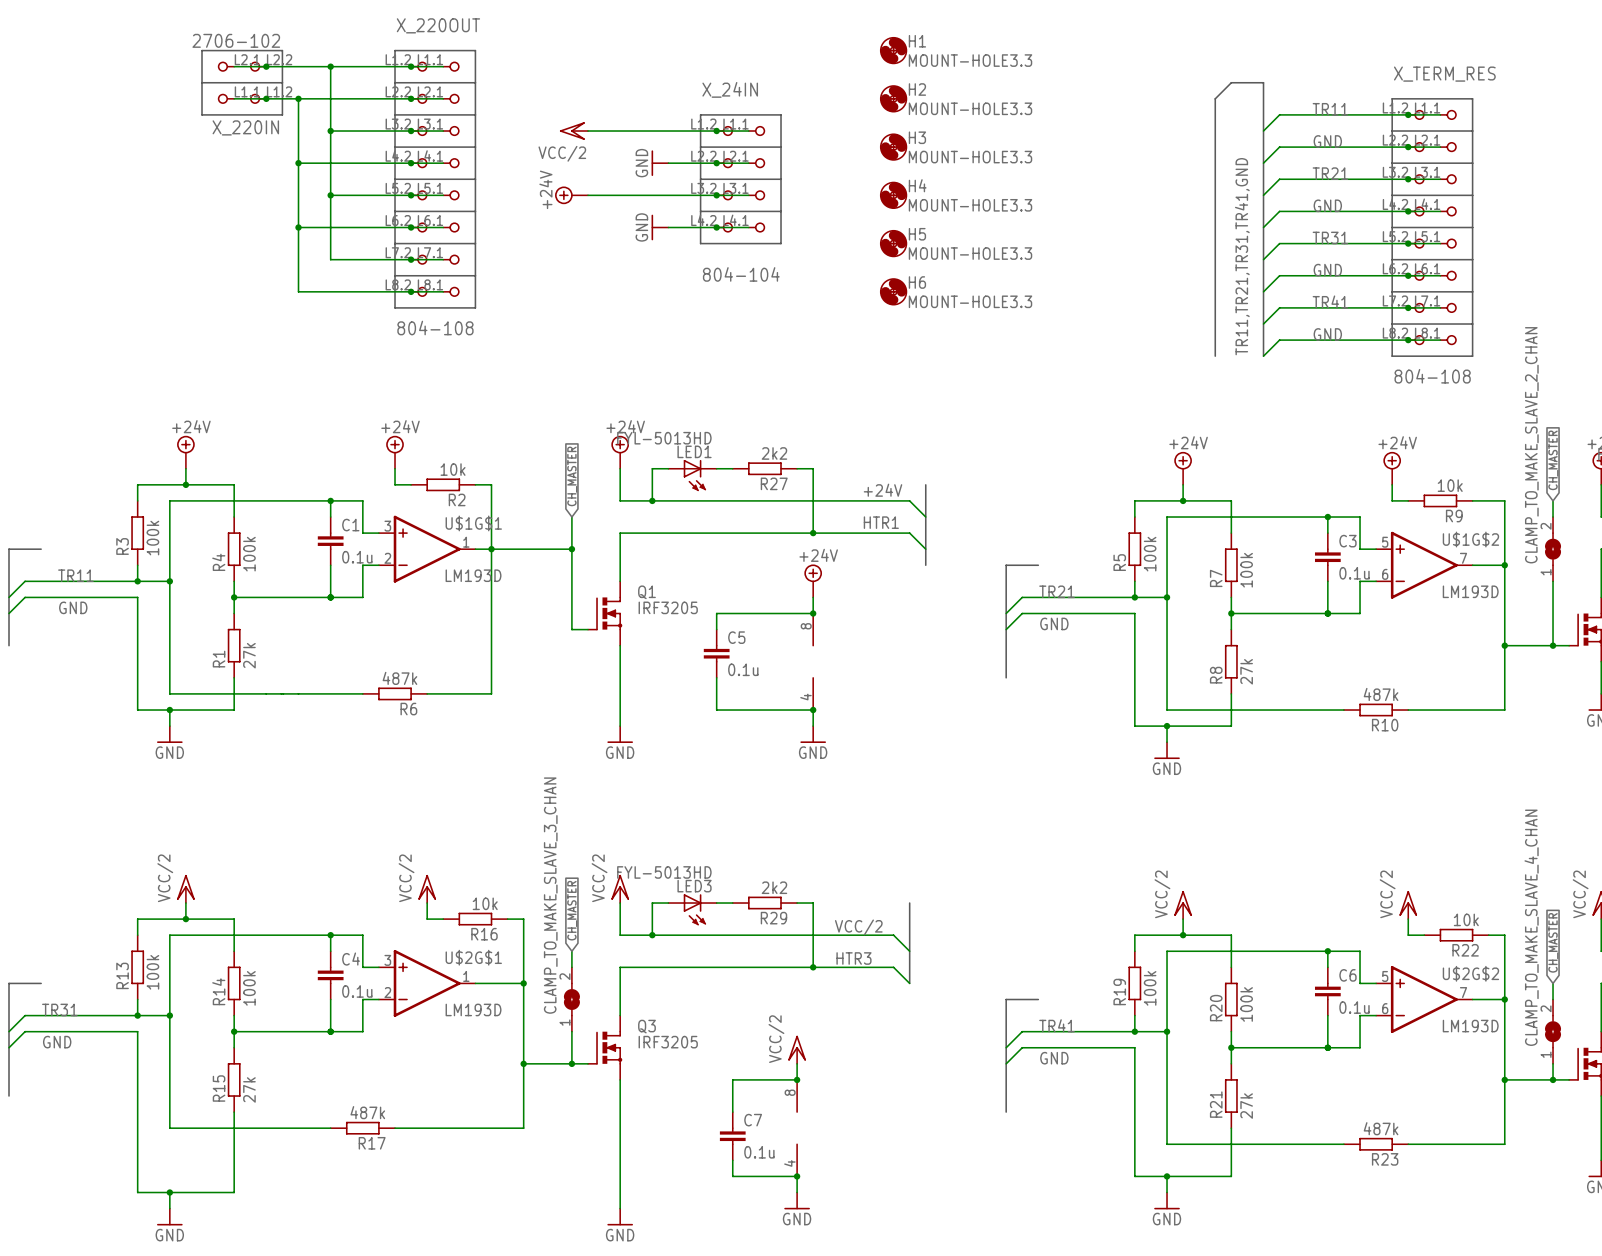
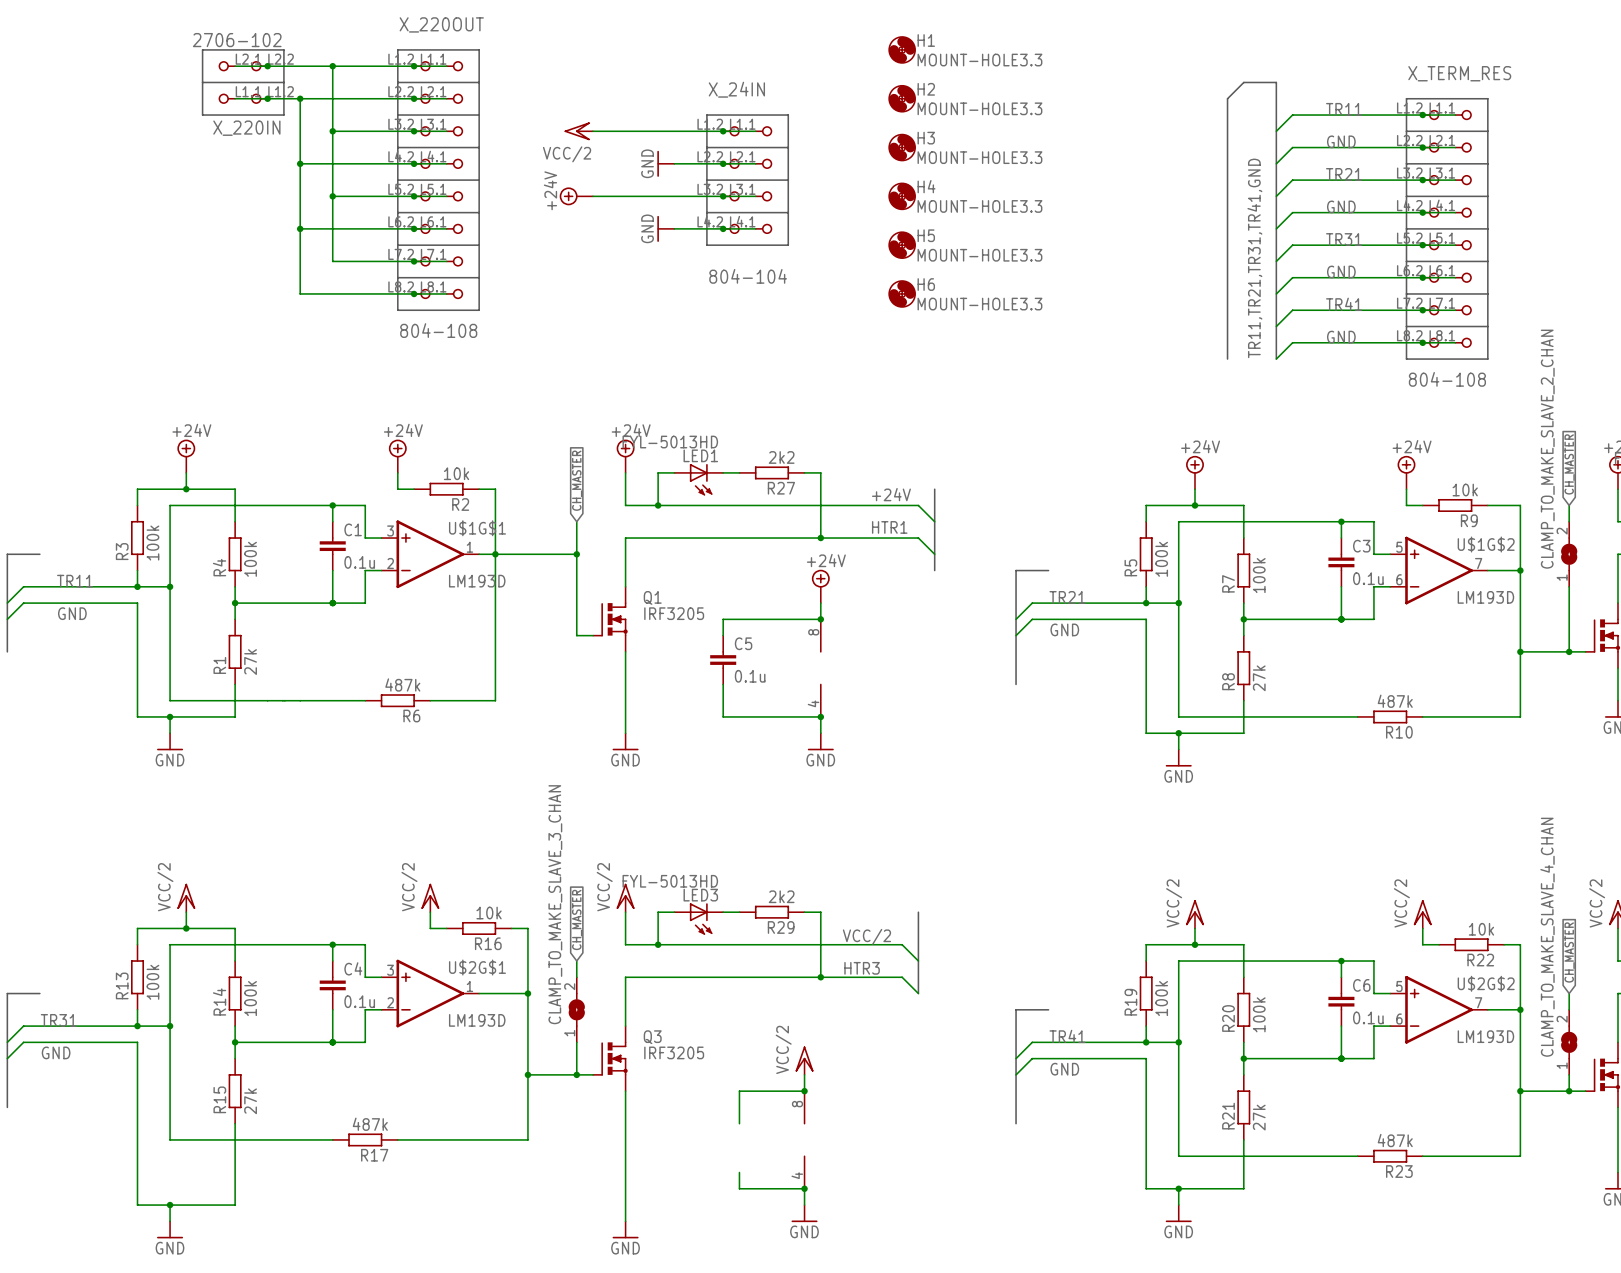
C7: 0.1u (732, 1136) -> none

